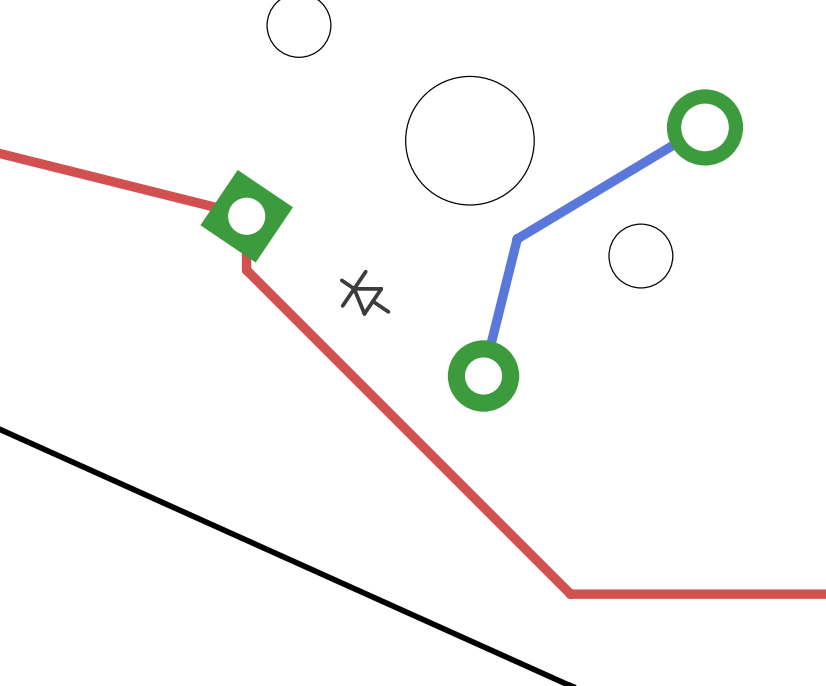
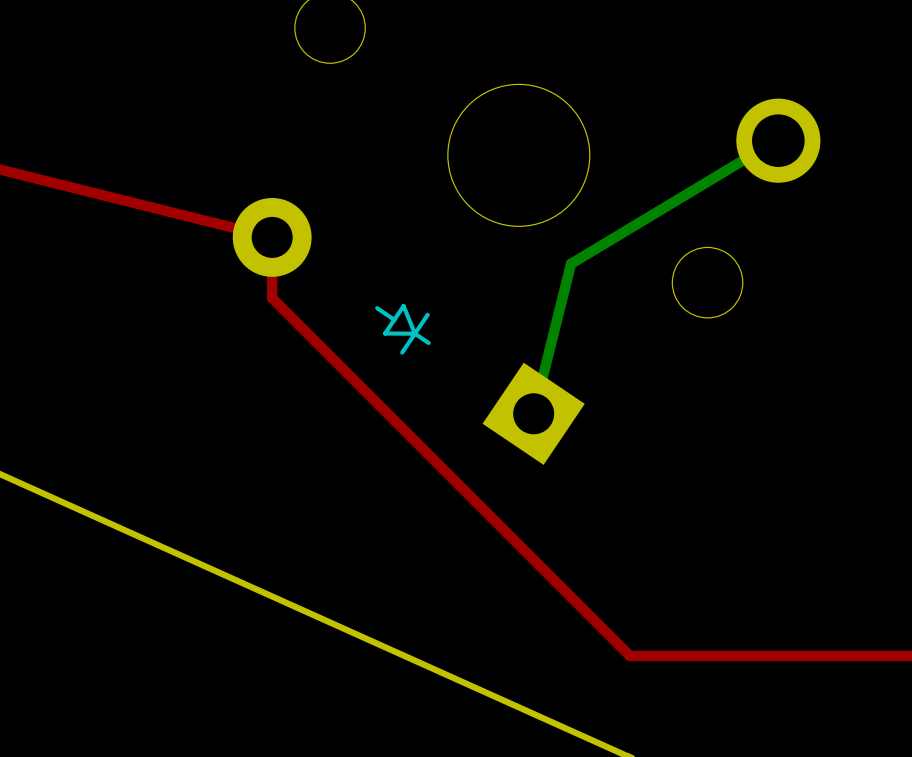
part footprint: [200, 169, 520, 412] -> [232, 197, 585, 465]

